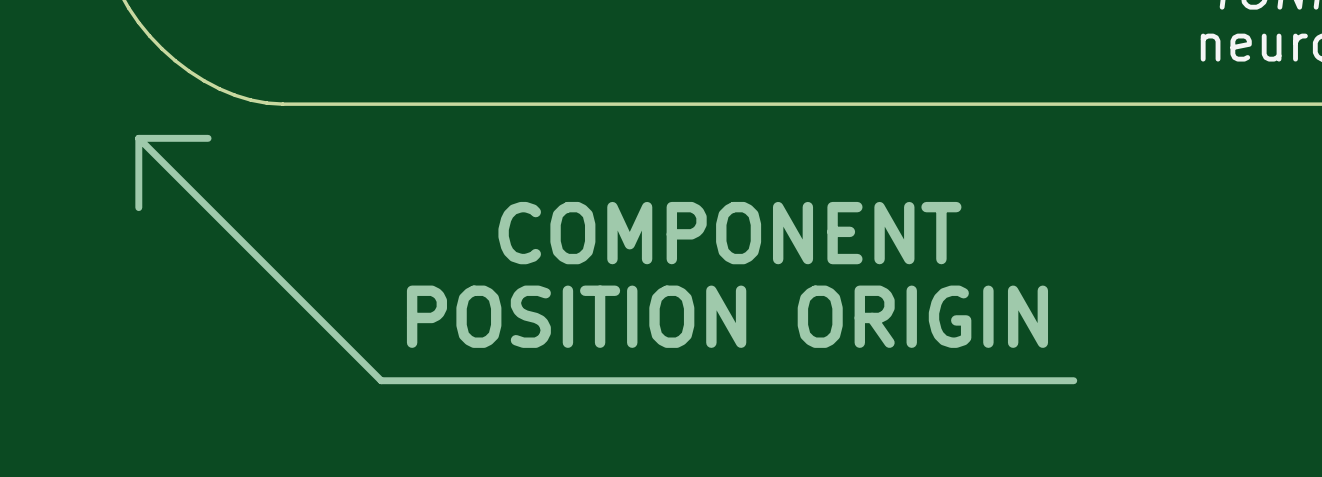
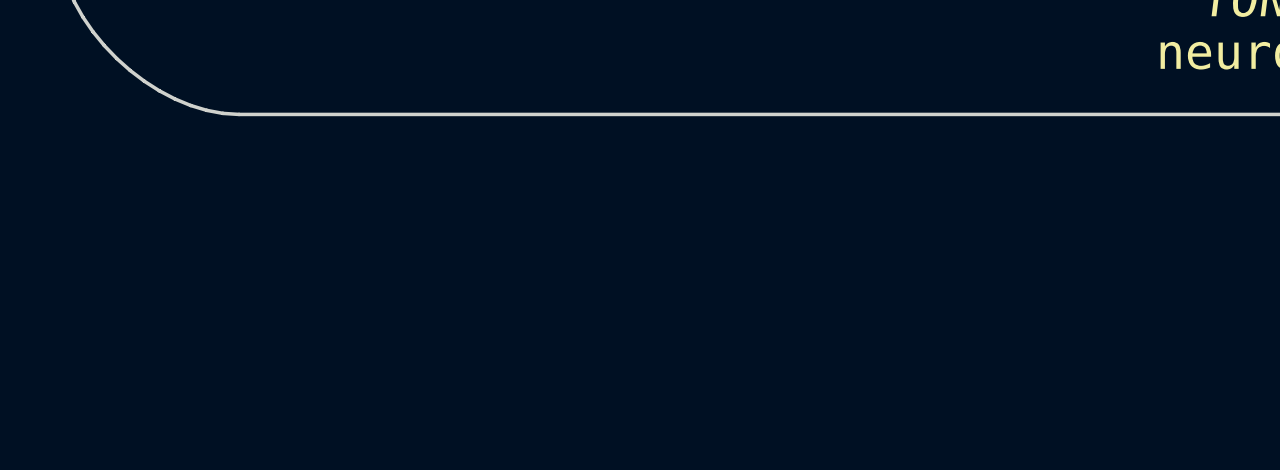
line: (138, 138) (208, 138) -> none
line: (138, 138) (381, 380) (1073, 380) -> none
line: (138, 138) (138, 207) -> none
text: COMPONENT (729, 233) -> none
text: POSITION ORIGIN (727, 316) -> none

